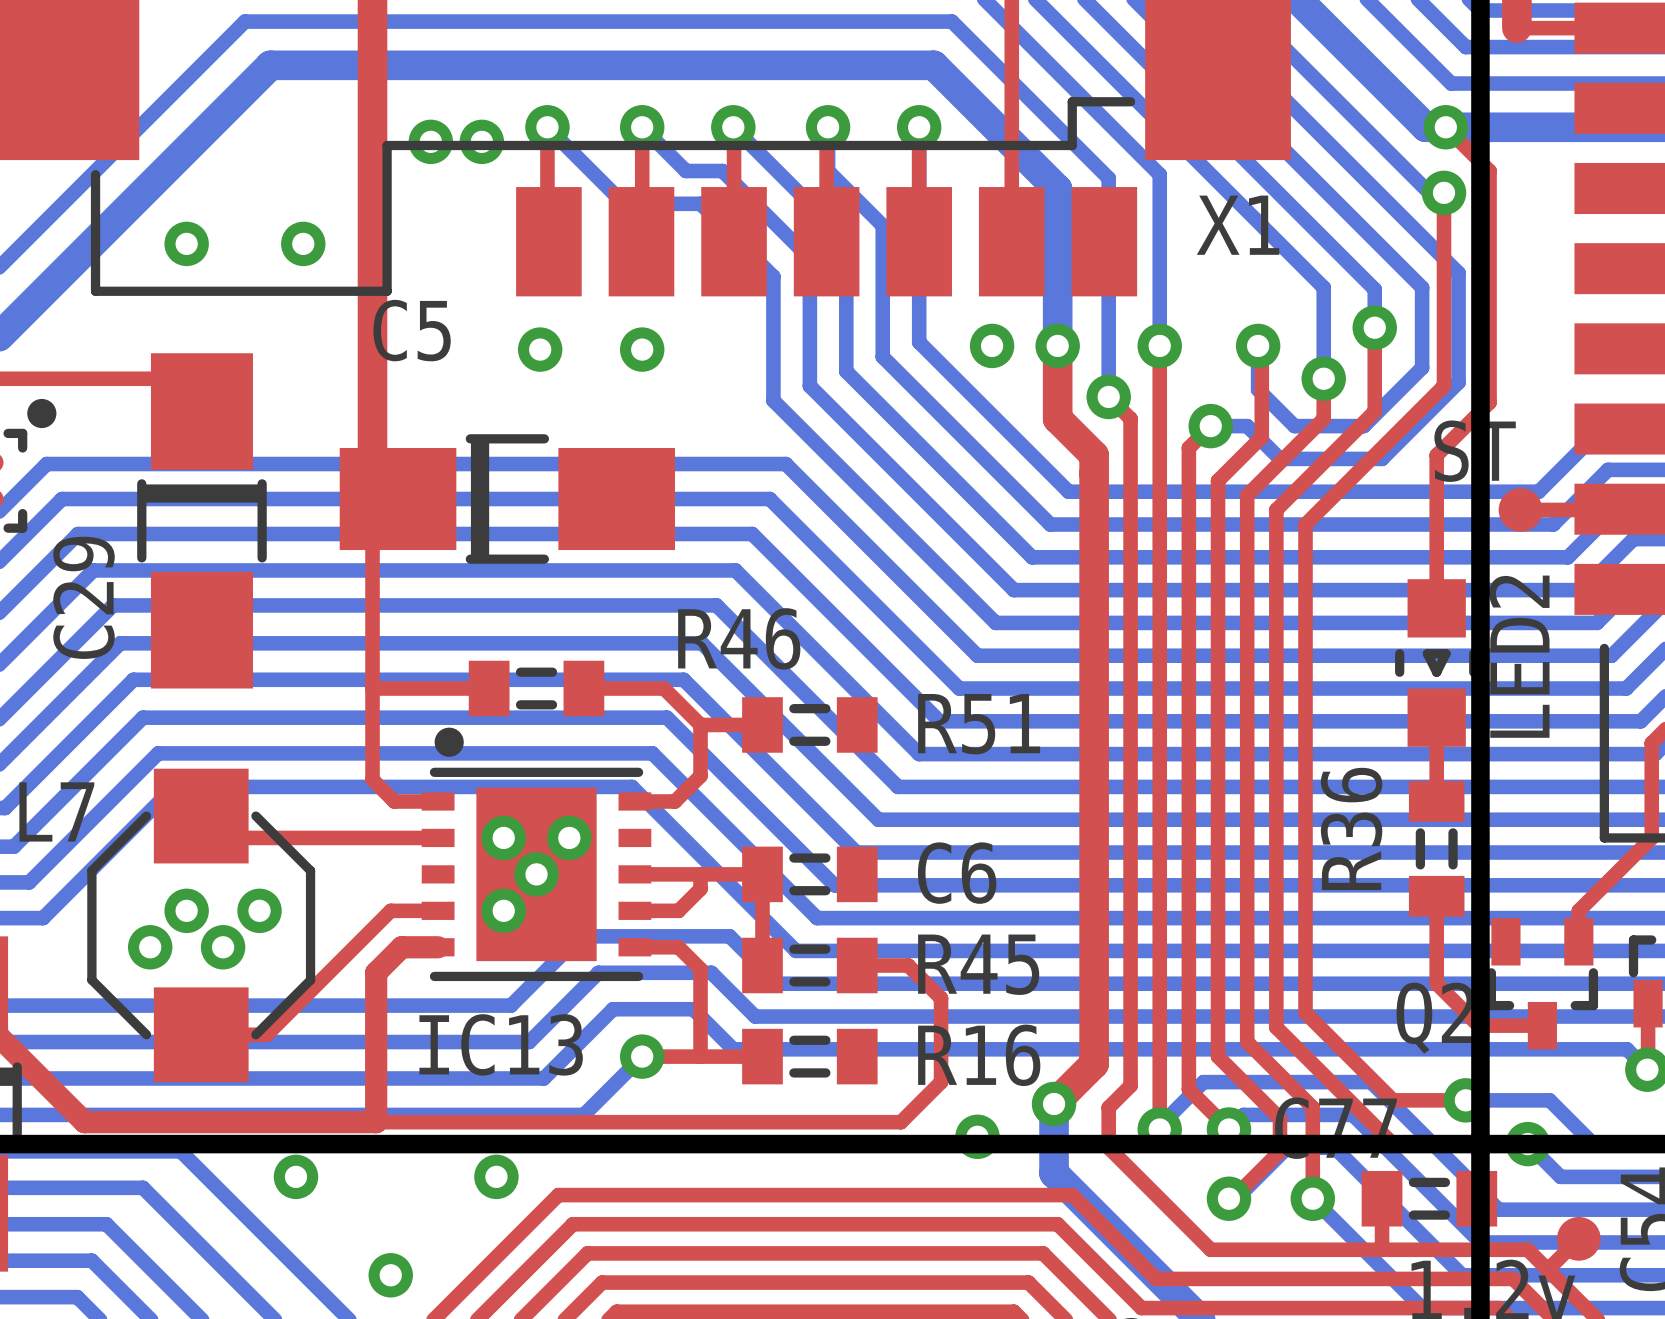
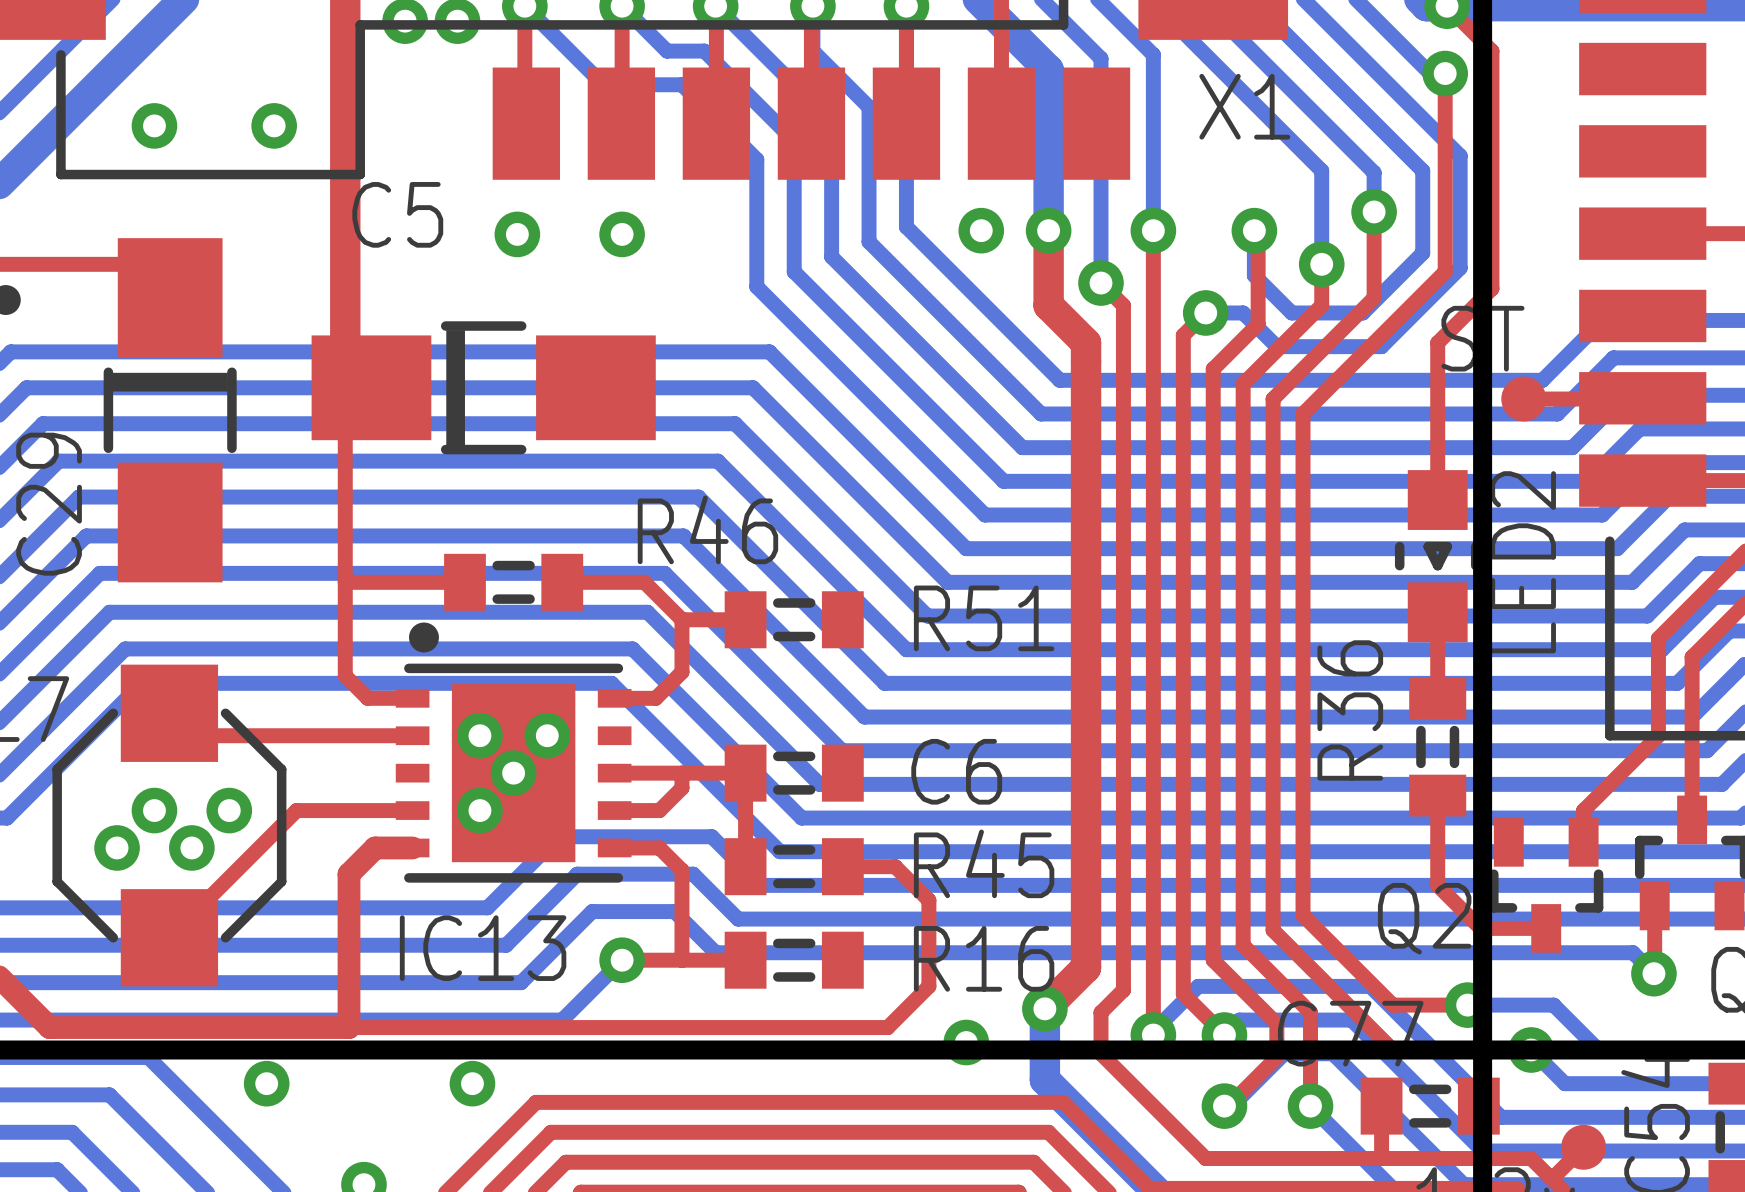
top track: (390, 910) (266, 1034) (201, 1034) -> (363, 810) (296, 810) (169, 937)

